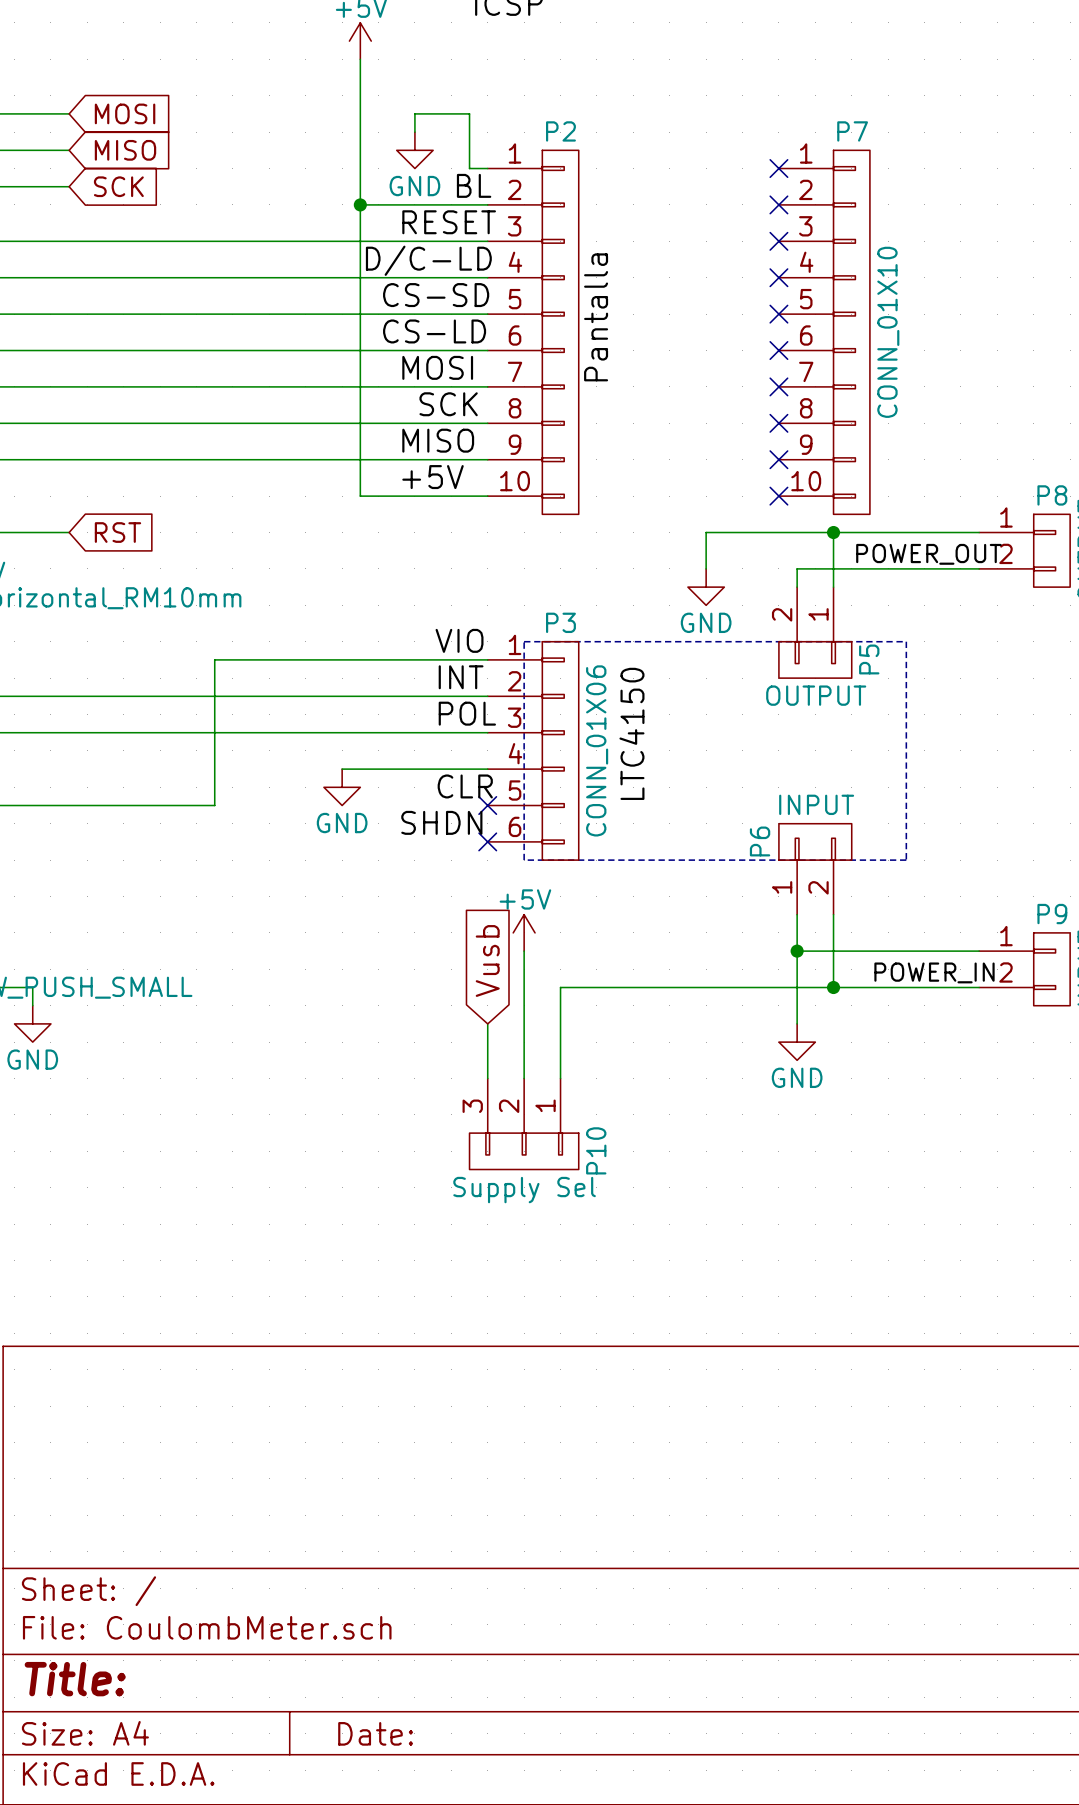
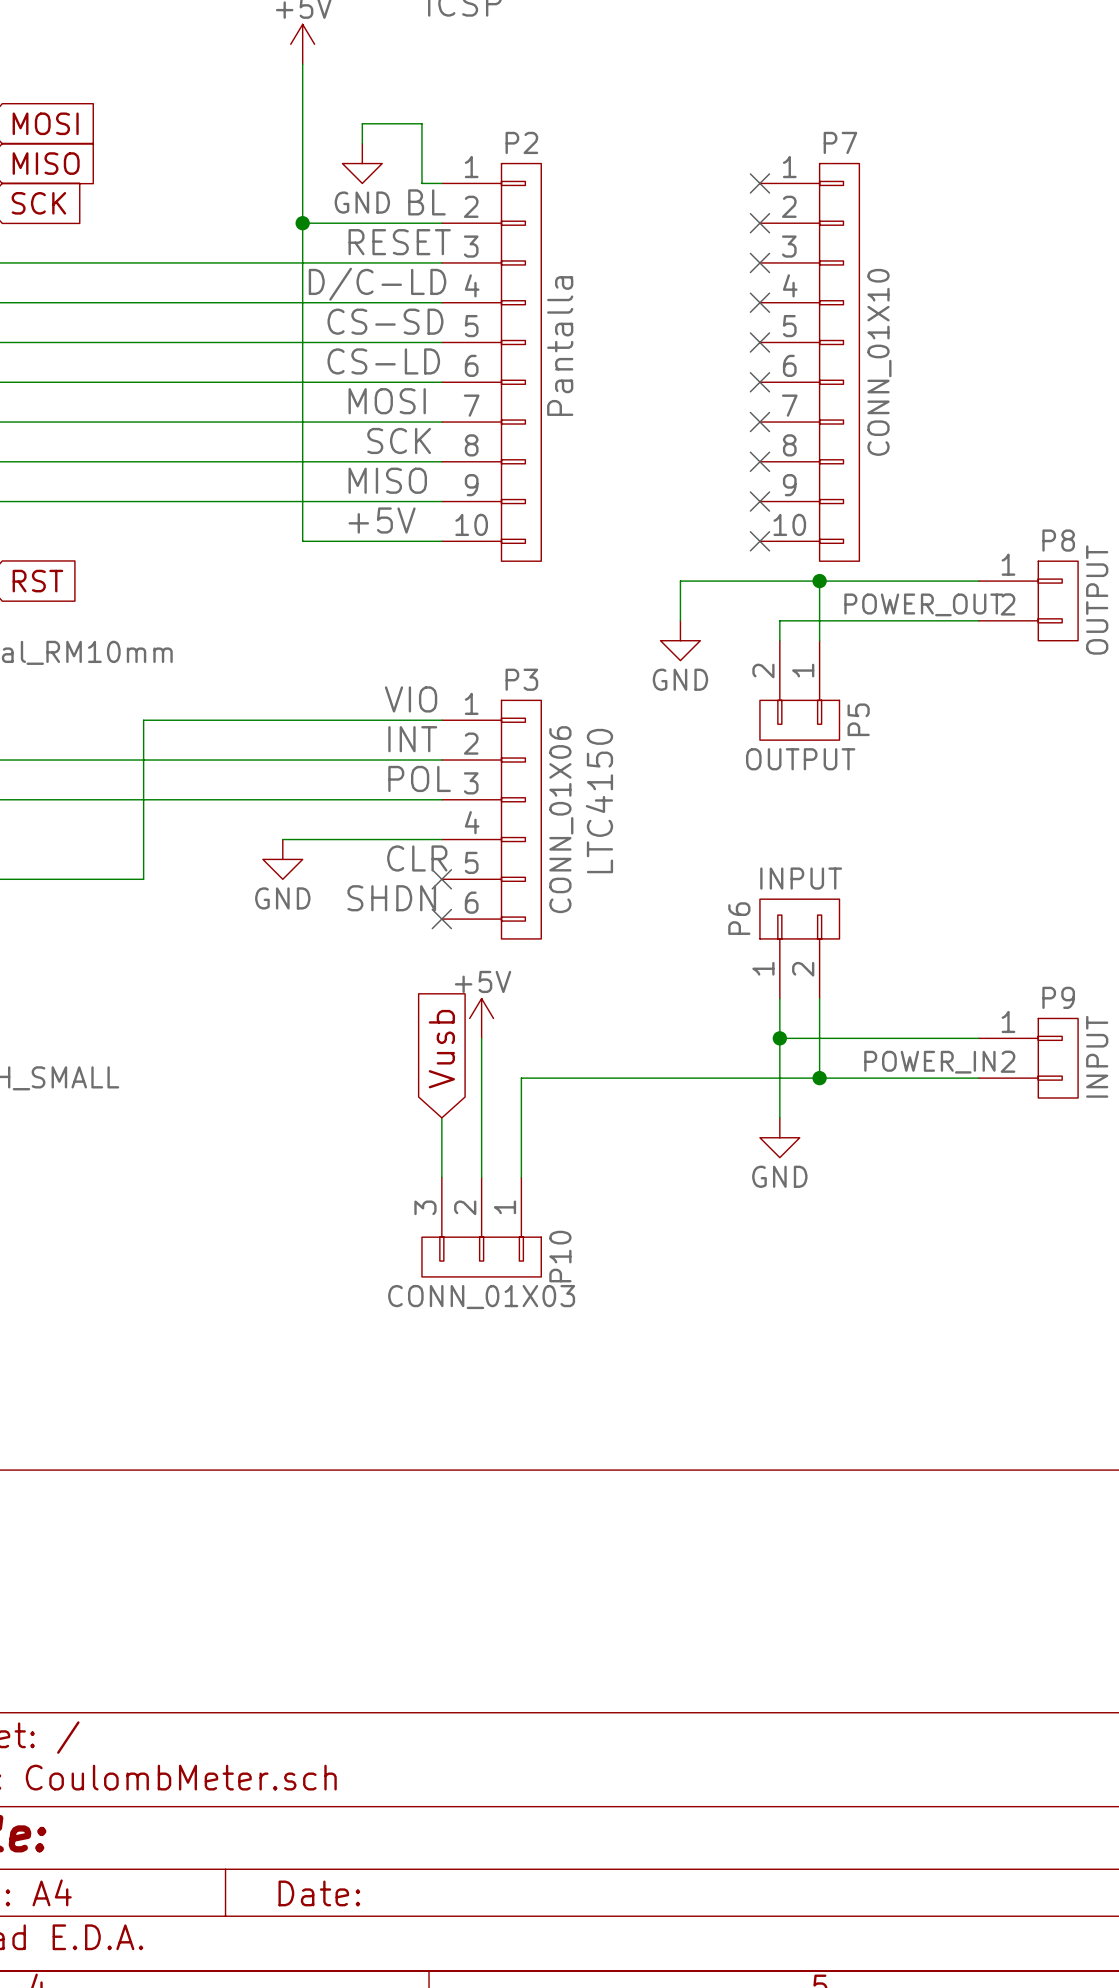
line: (524, 641) (906, 641) (906, 860) (524, 860) (524, 641) -> none
P10 value: Supply Sel (524, 1190) -> CONN_01X03 (481, 1297)

